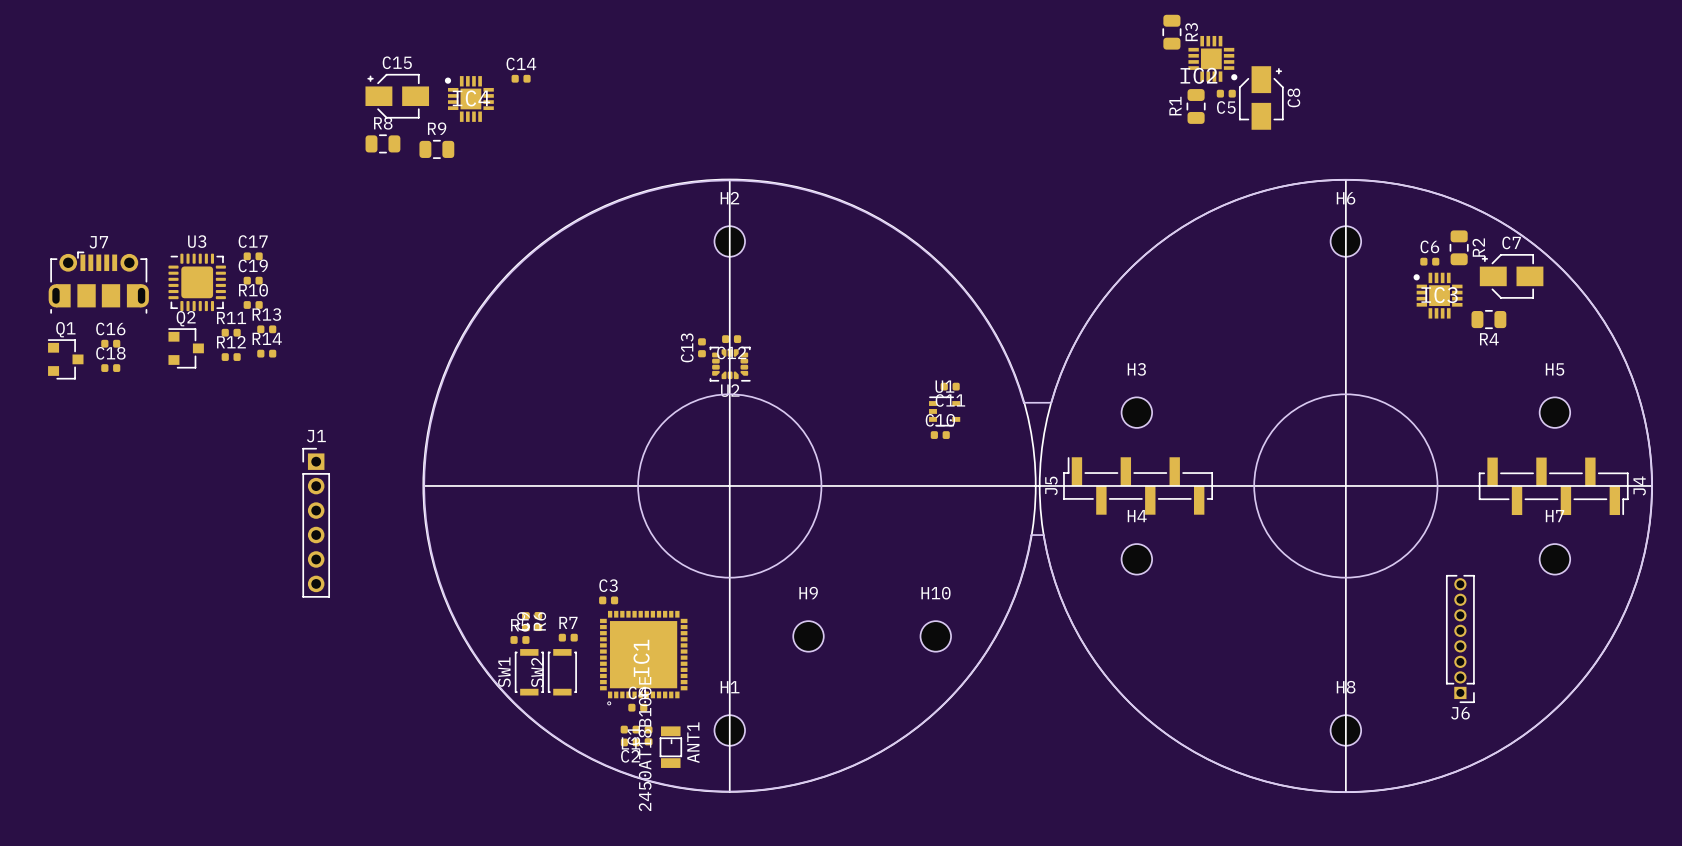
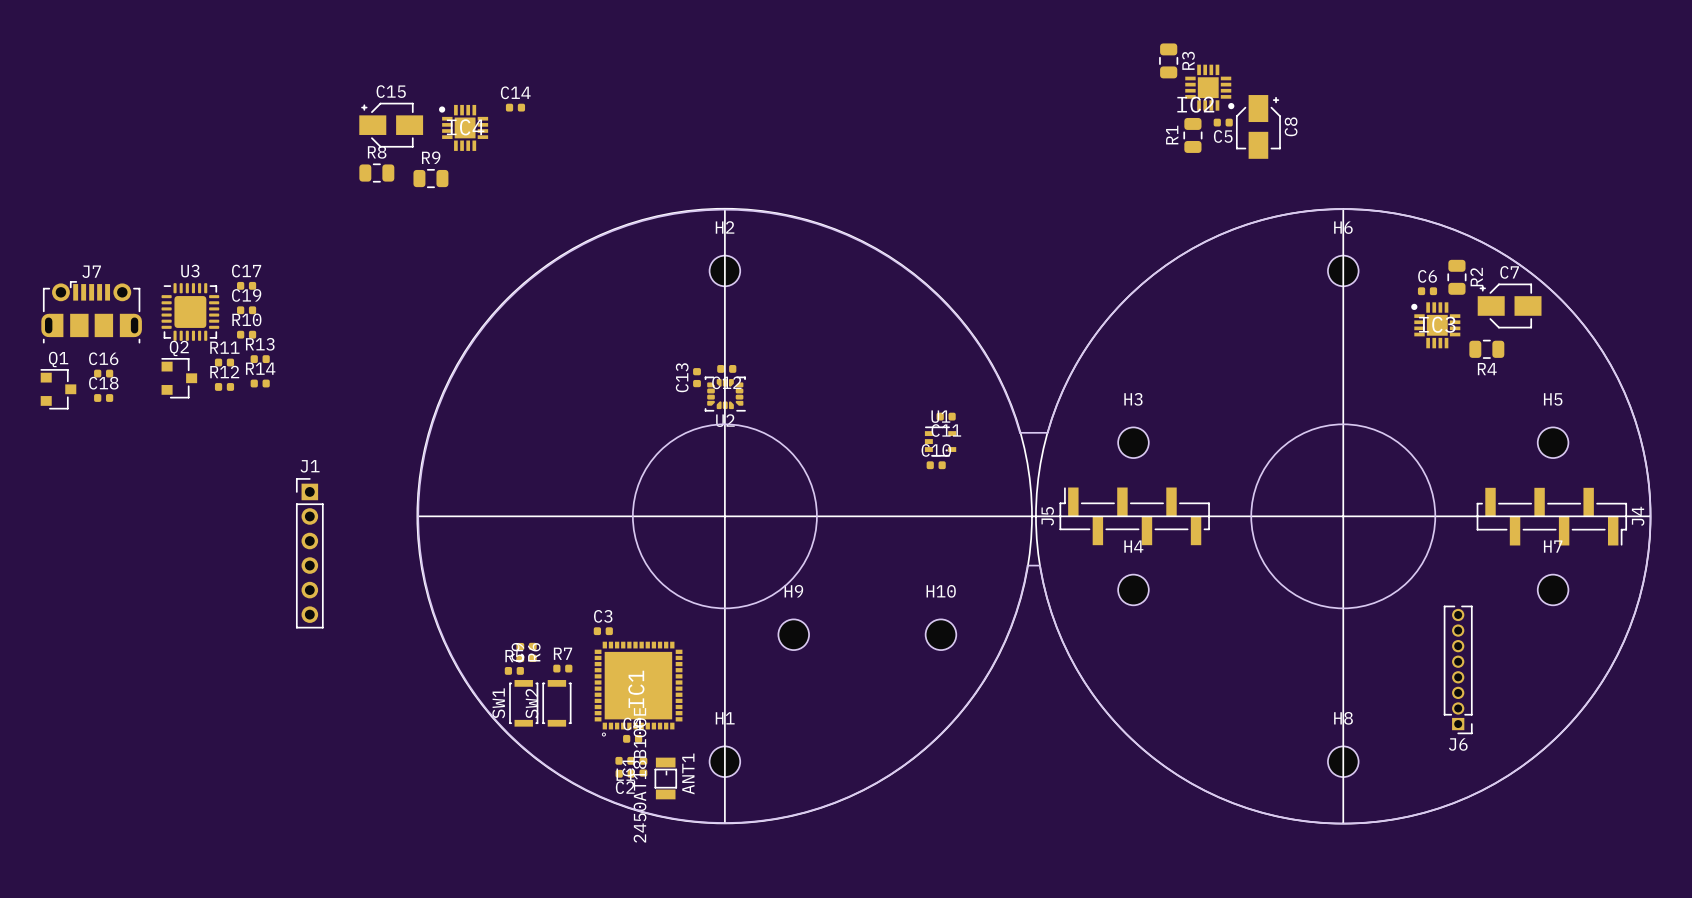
H9 position: (808, 636) -> (793, 634)
H10 position: (935, 636) -> (940, 634)

